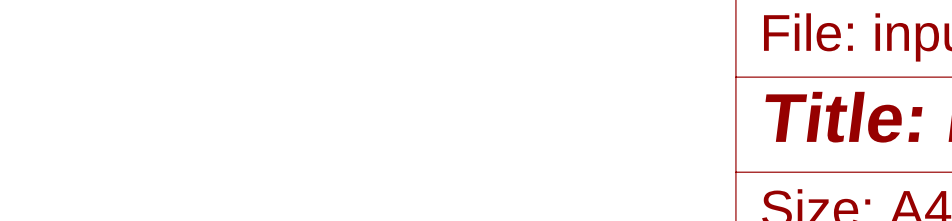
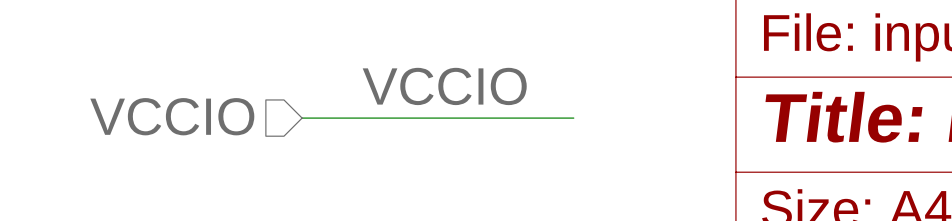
label: none -> VCCIO (444, 86)
hierarchical label: none -> VCCIO (172, 116)
wire: none -> (302, 118) (573, 118)

